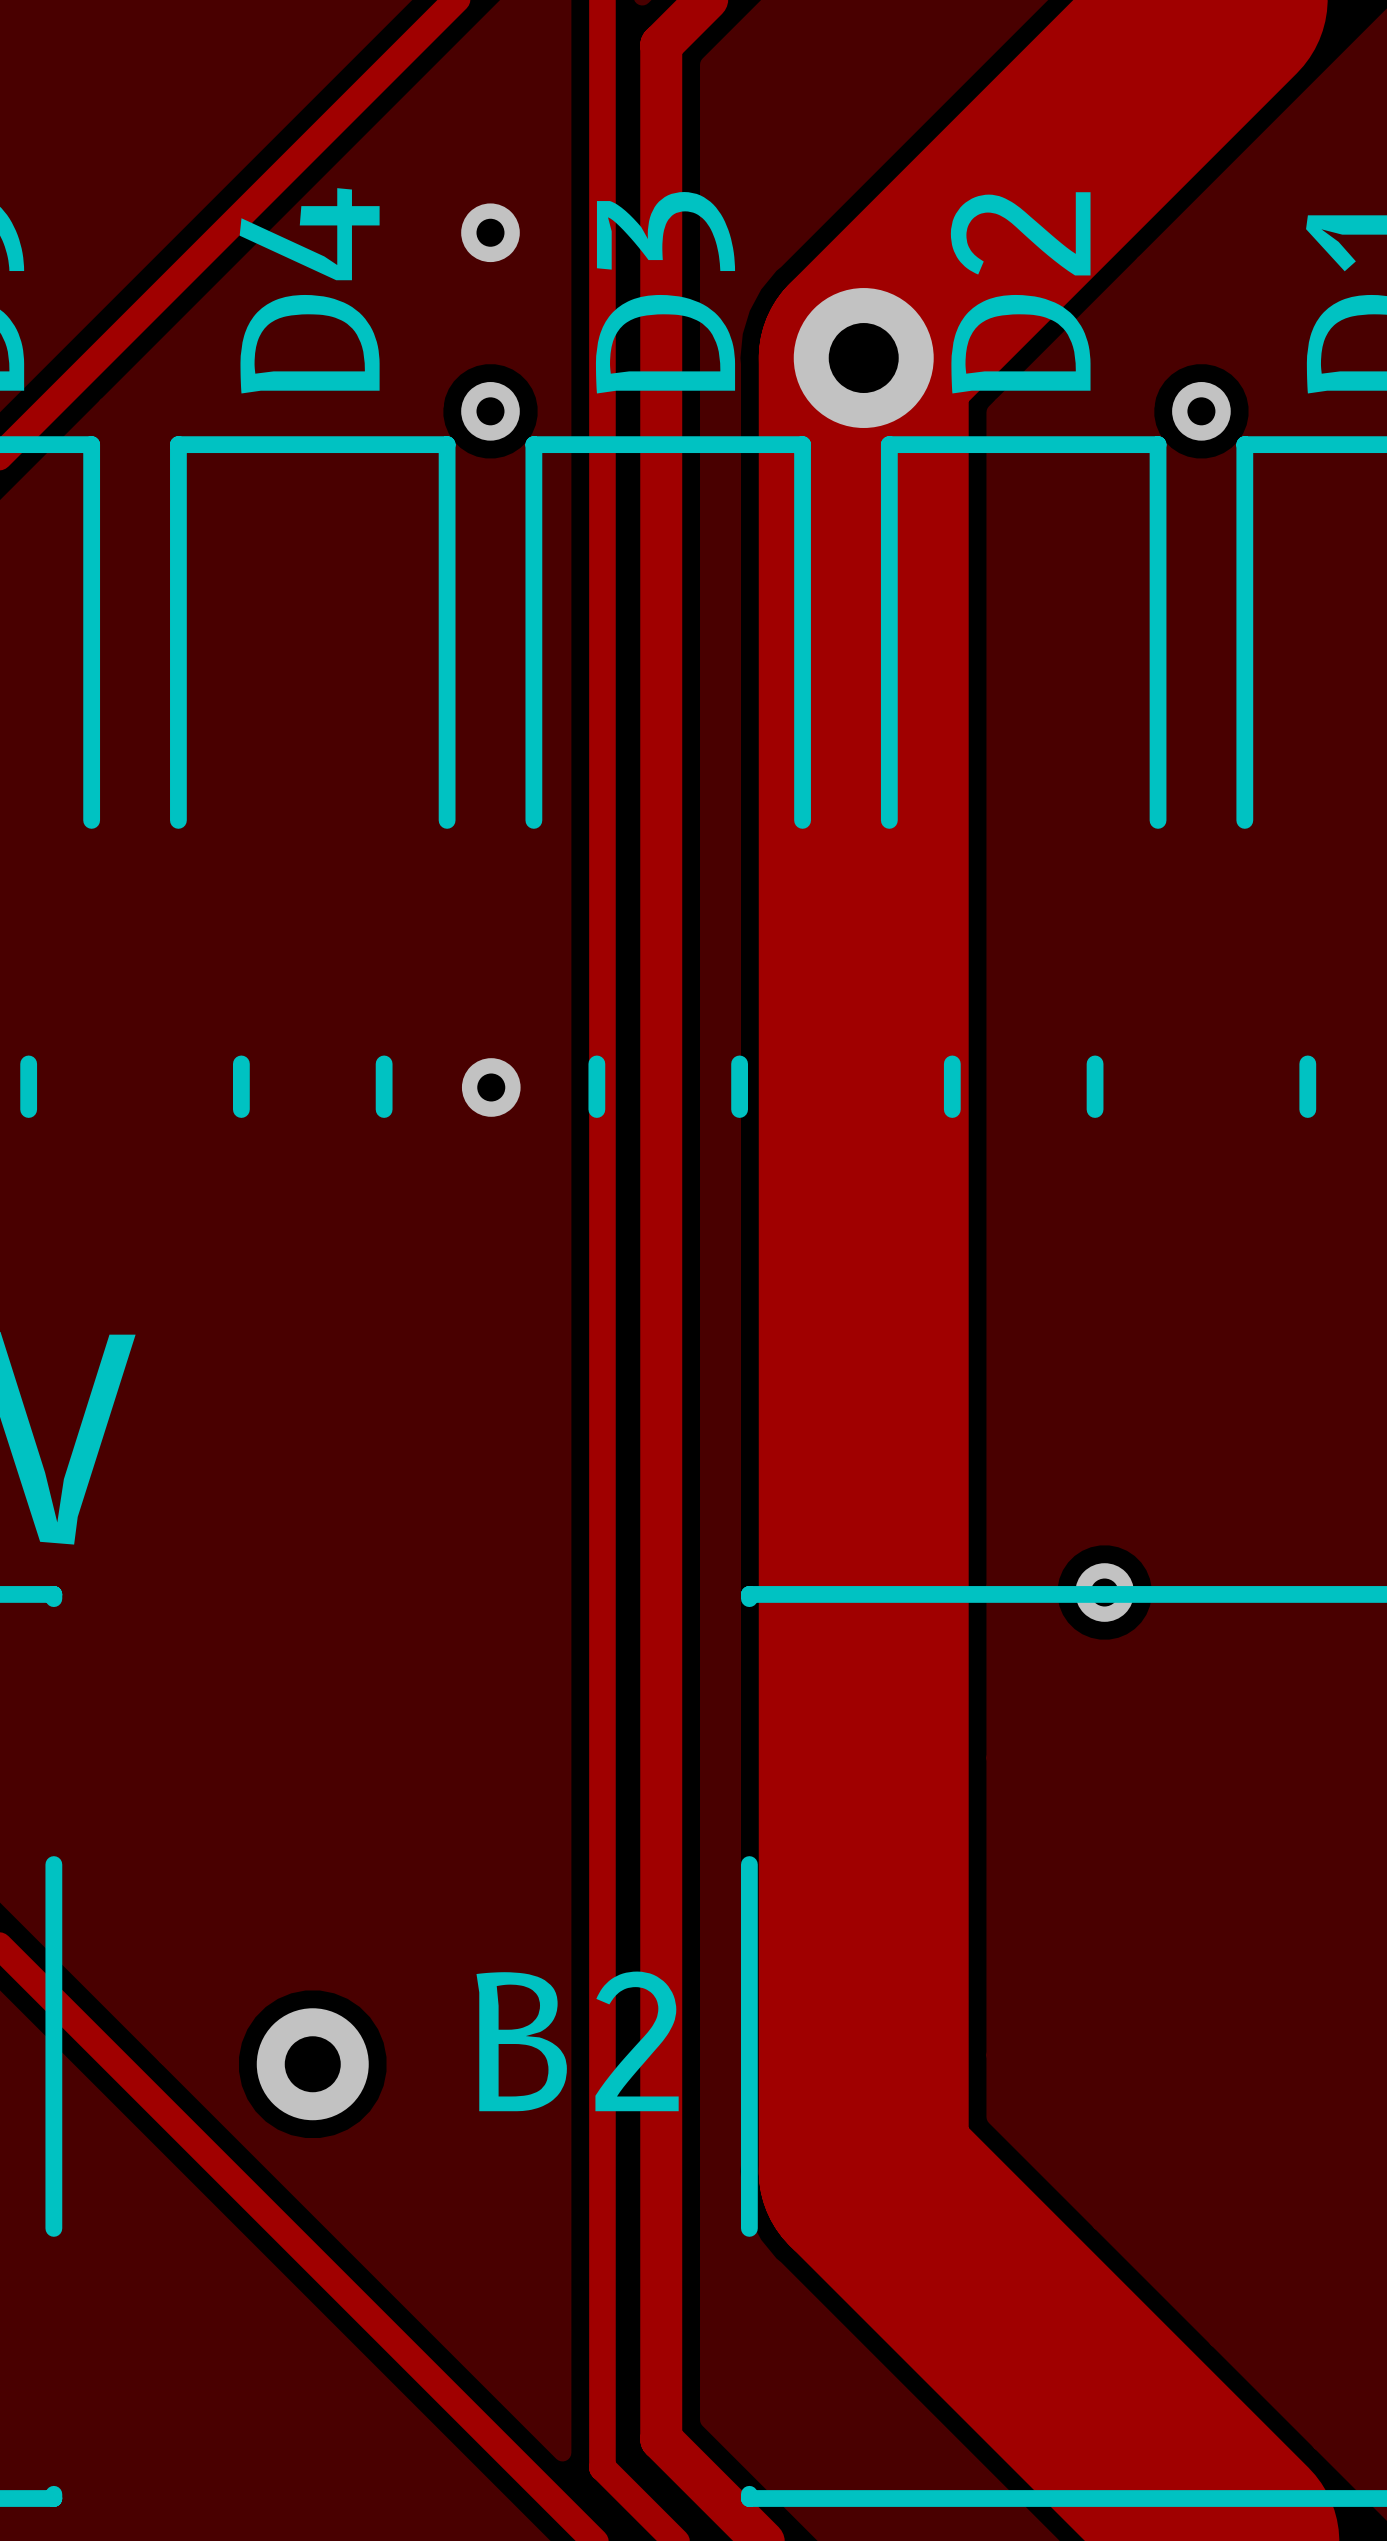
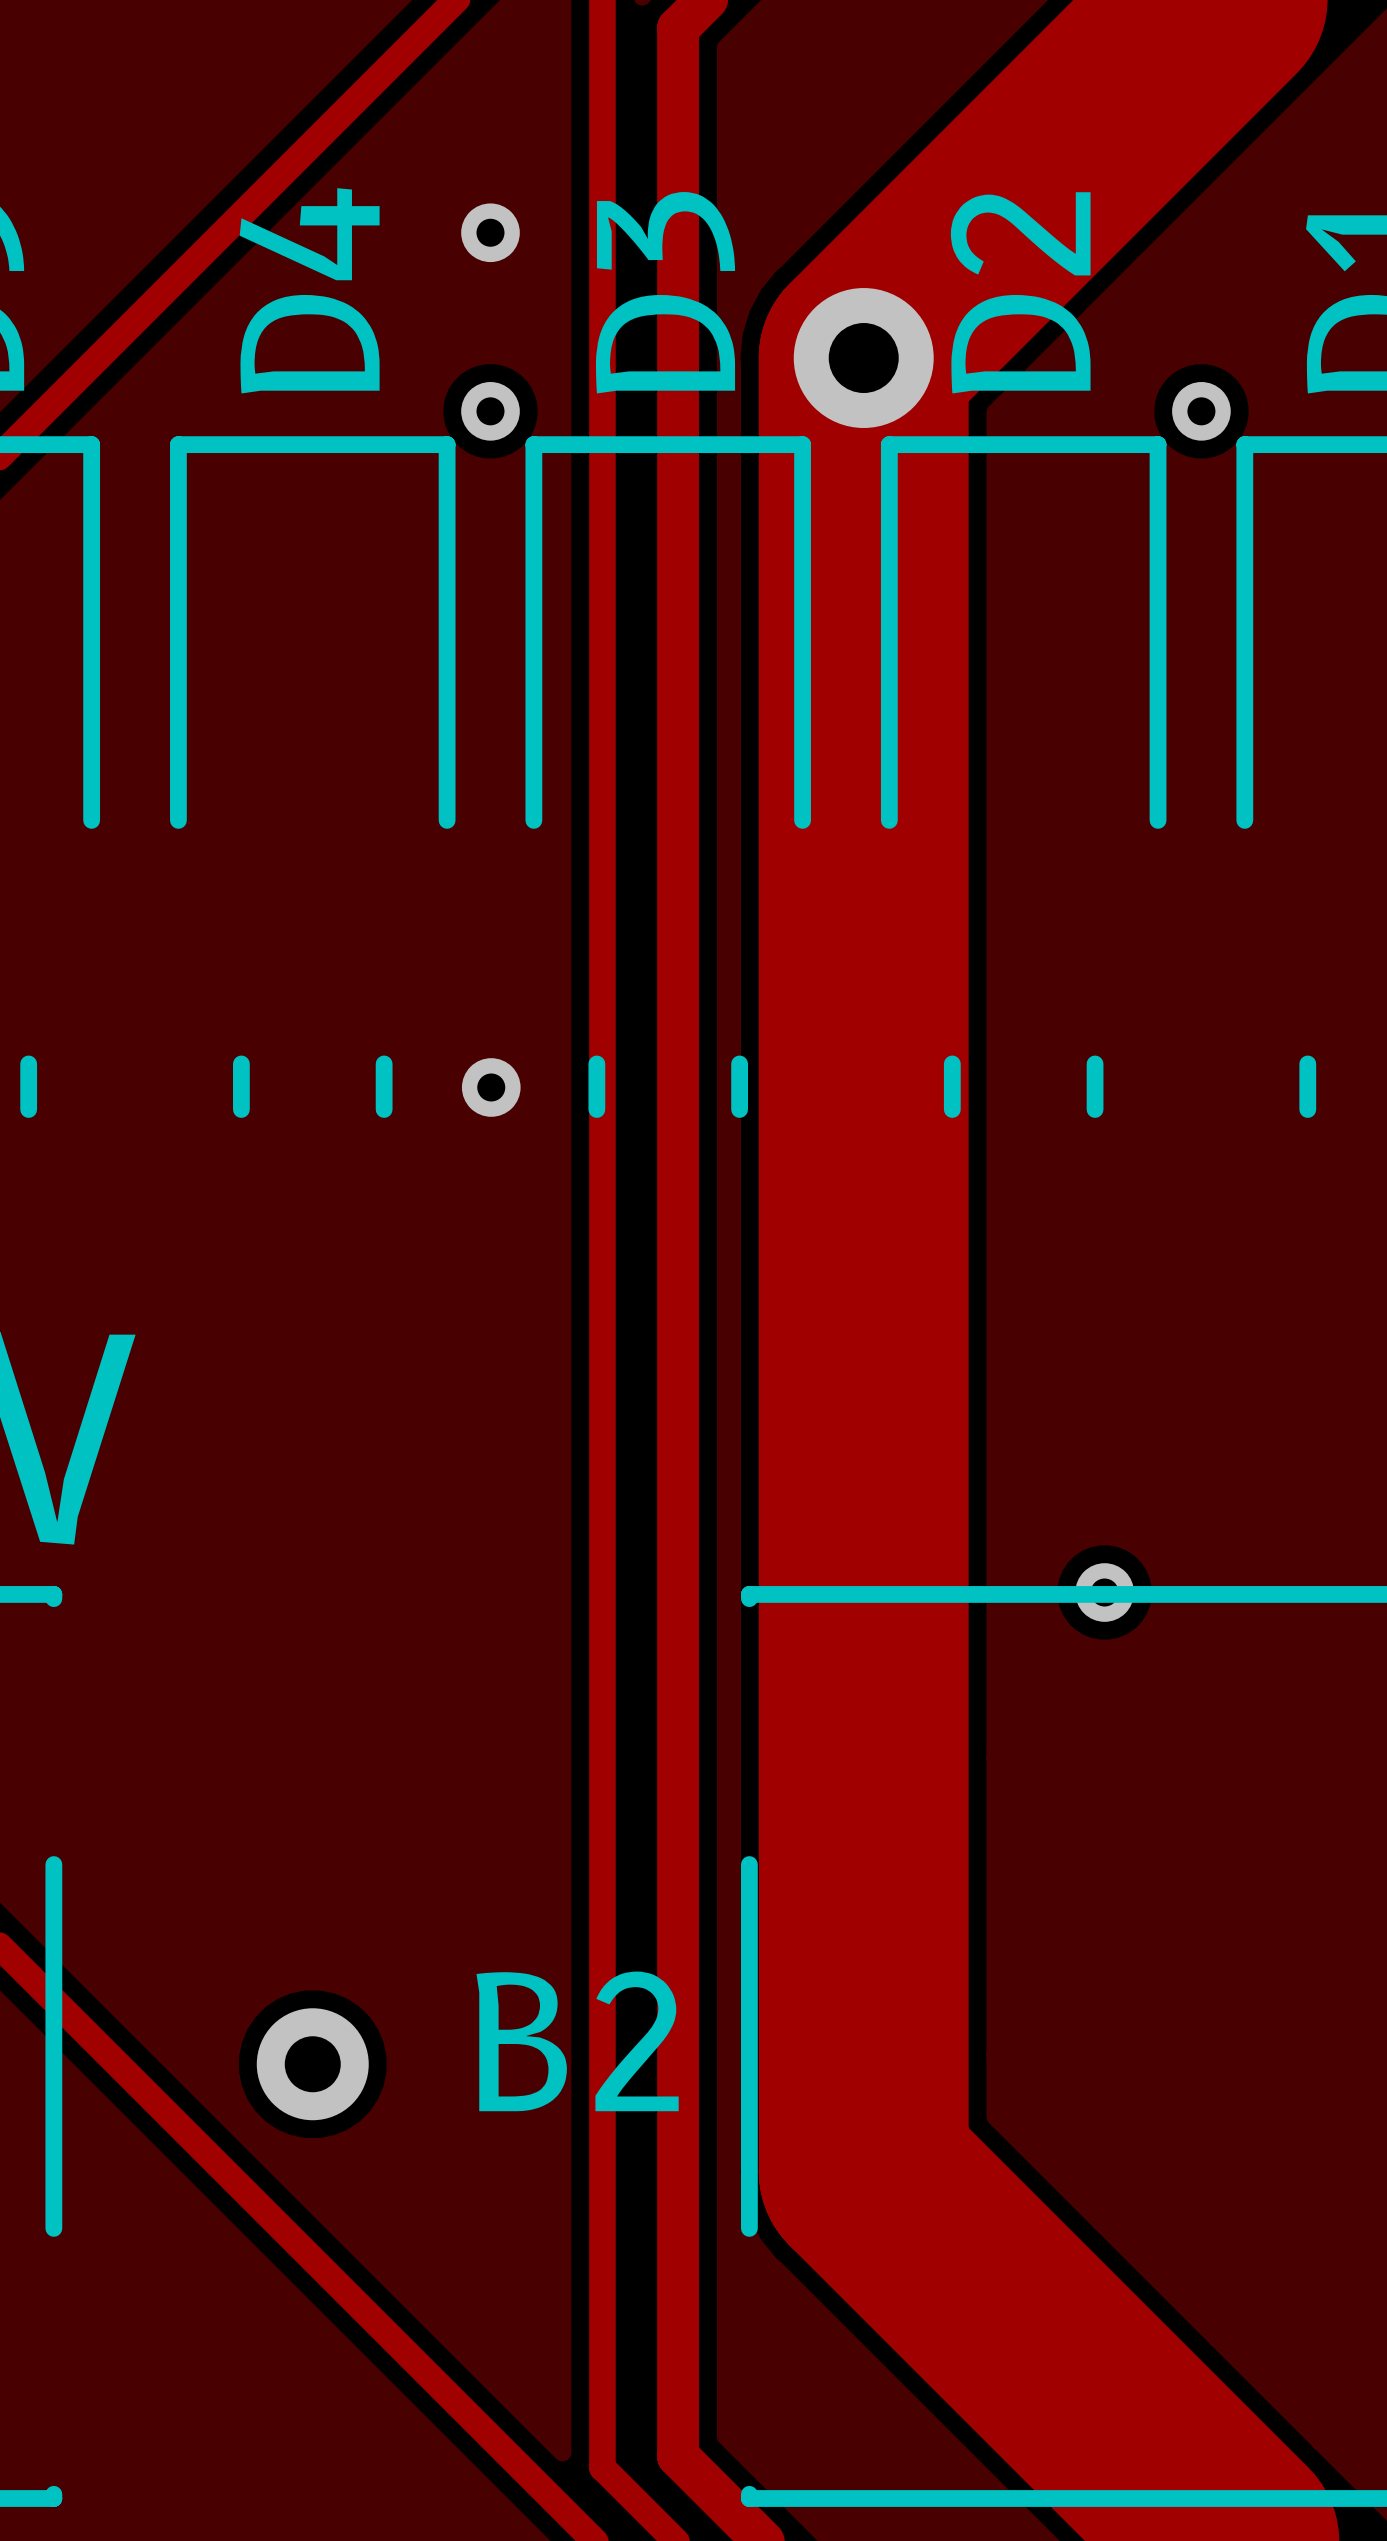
track: (678, 28) (661, 45) (661, 2439) (678, 2456) -> (678, 28) (678, 2456)

